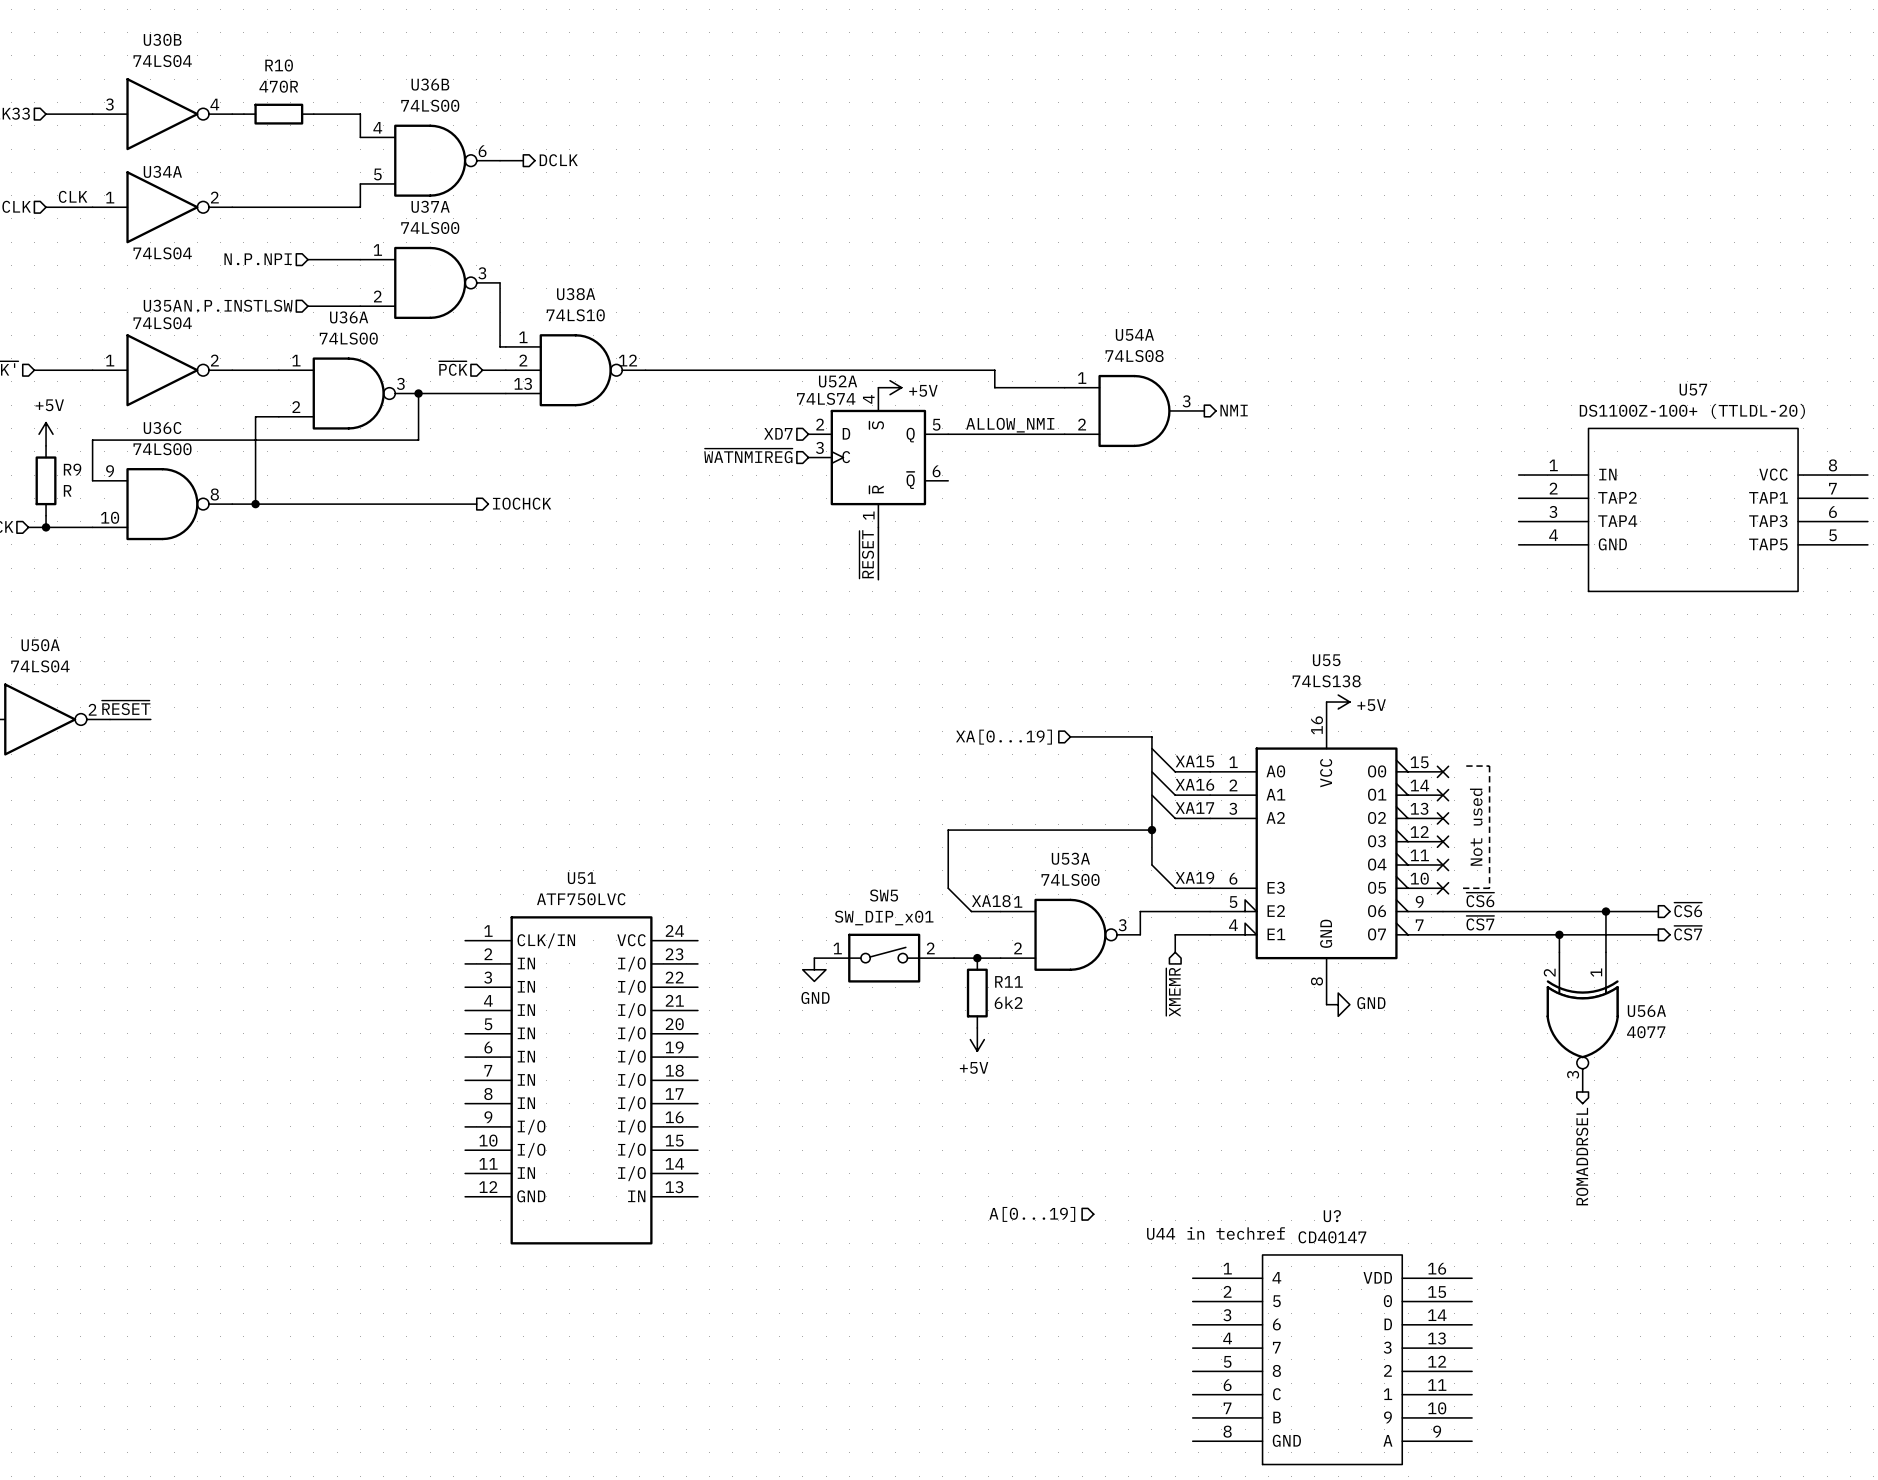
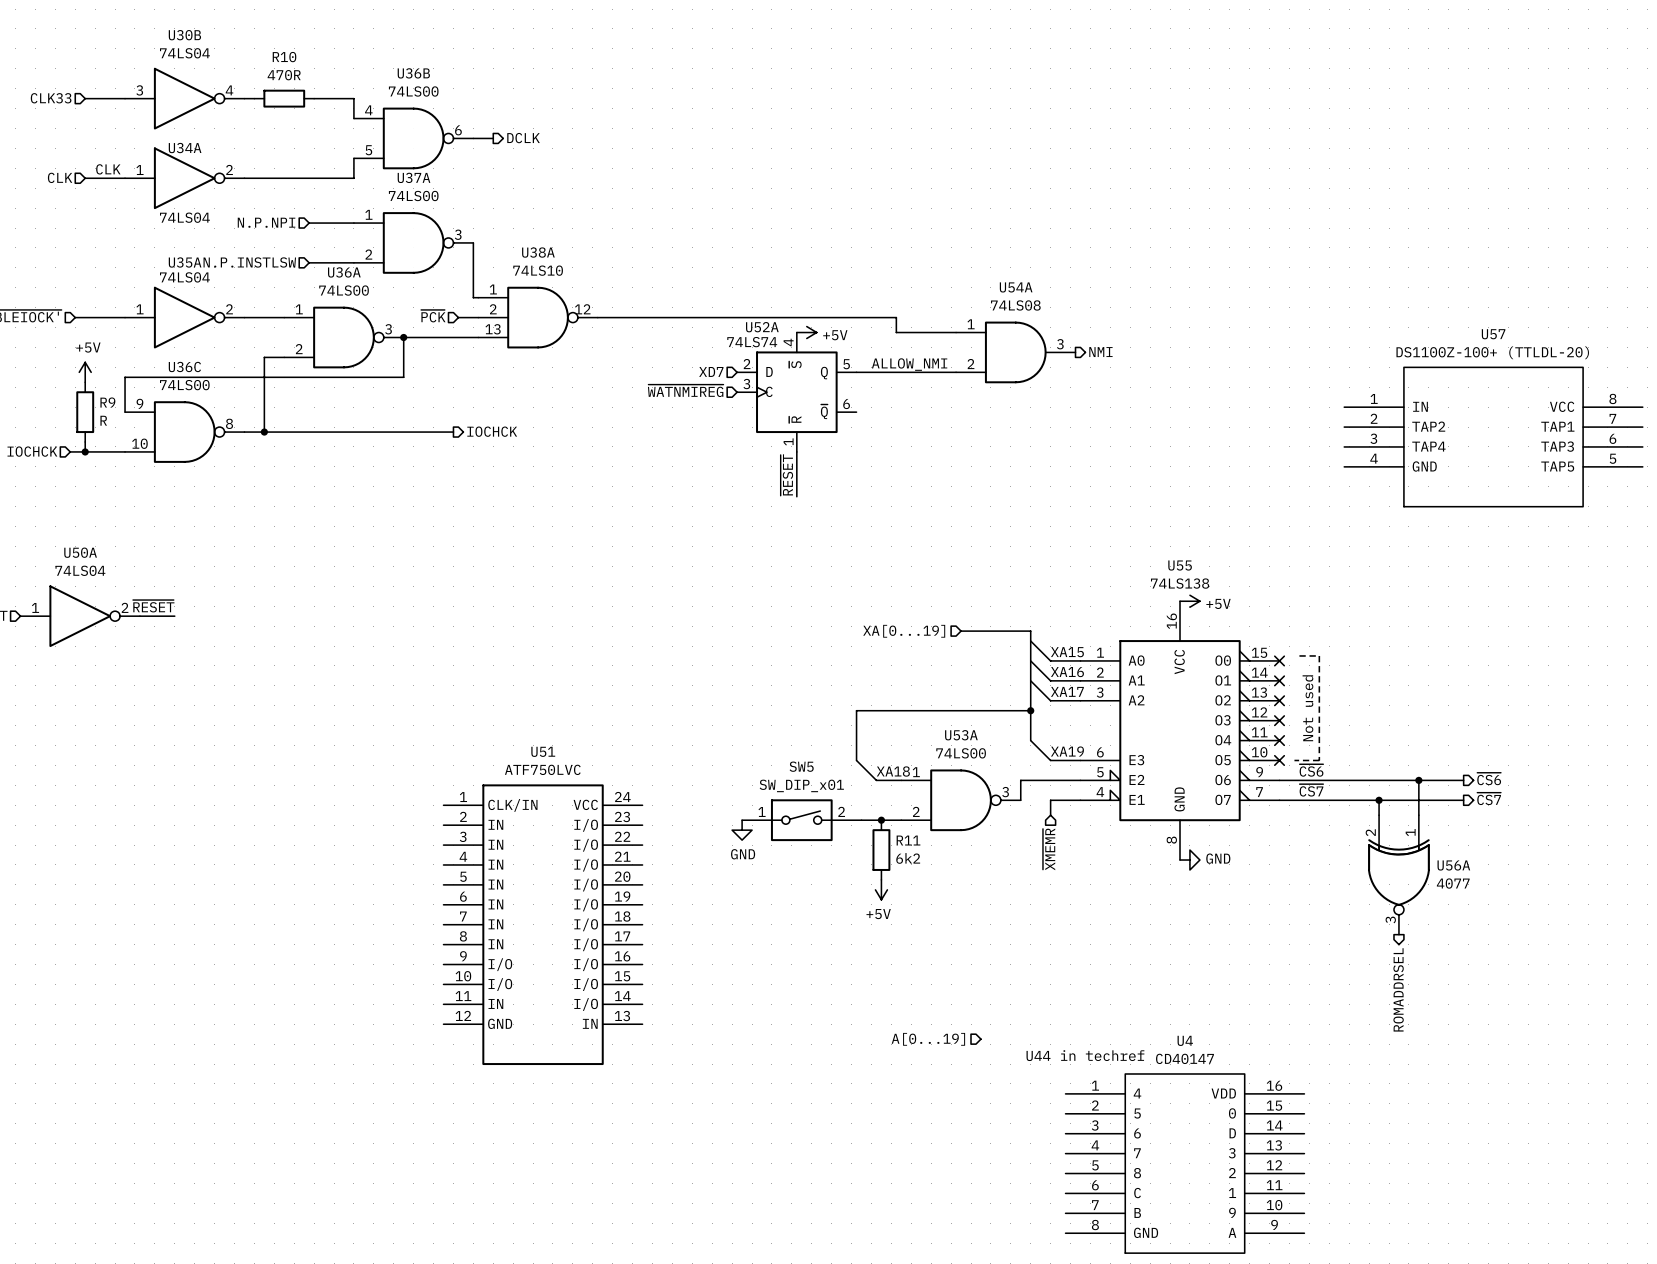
U? name: U? (1332, 1216) -> U4 (1185, 1040)

